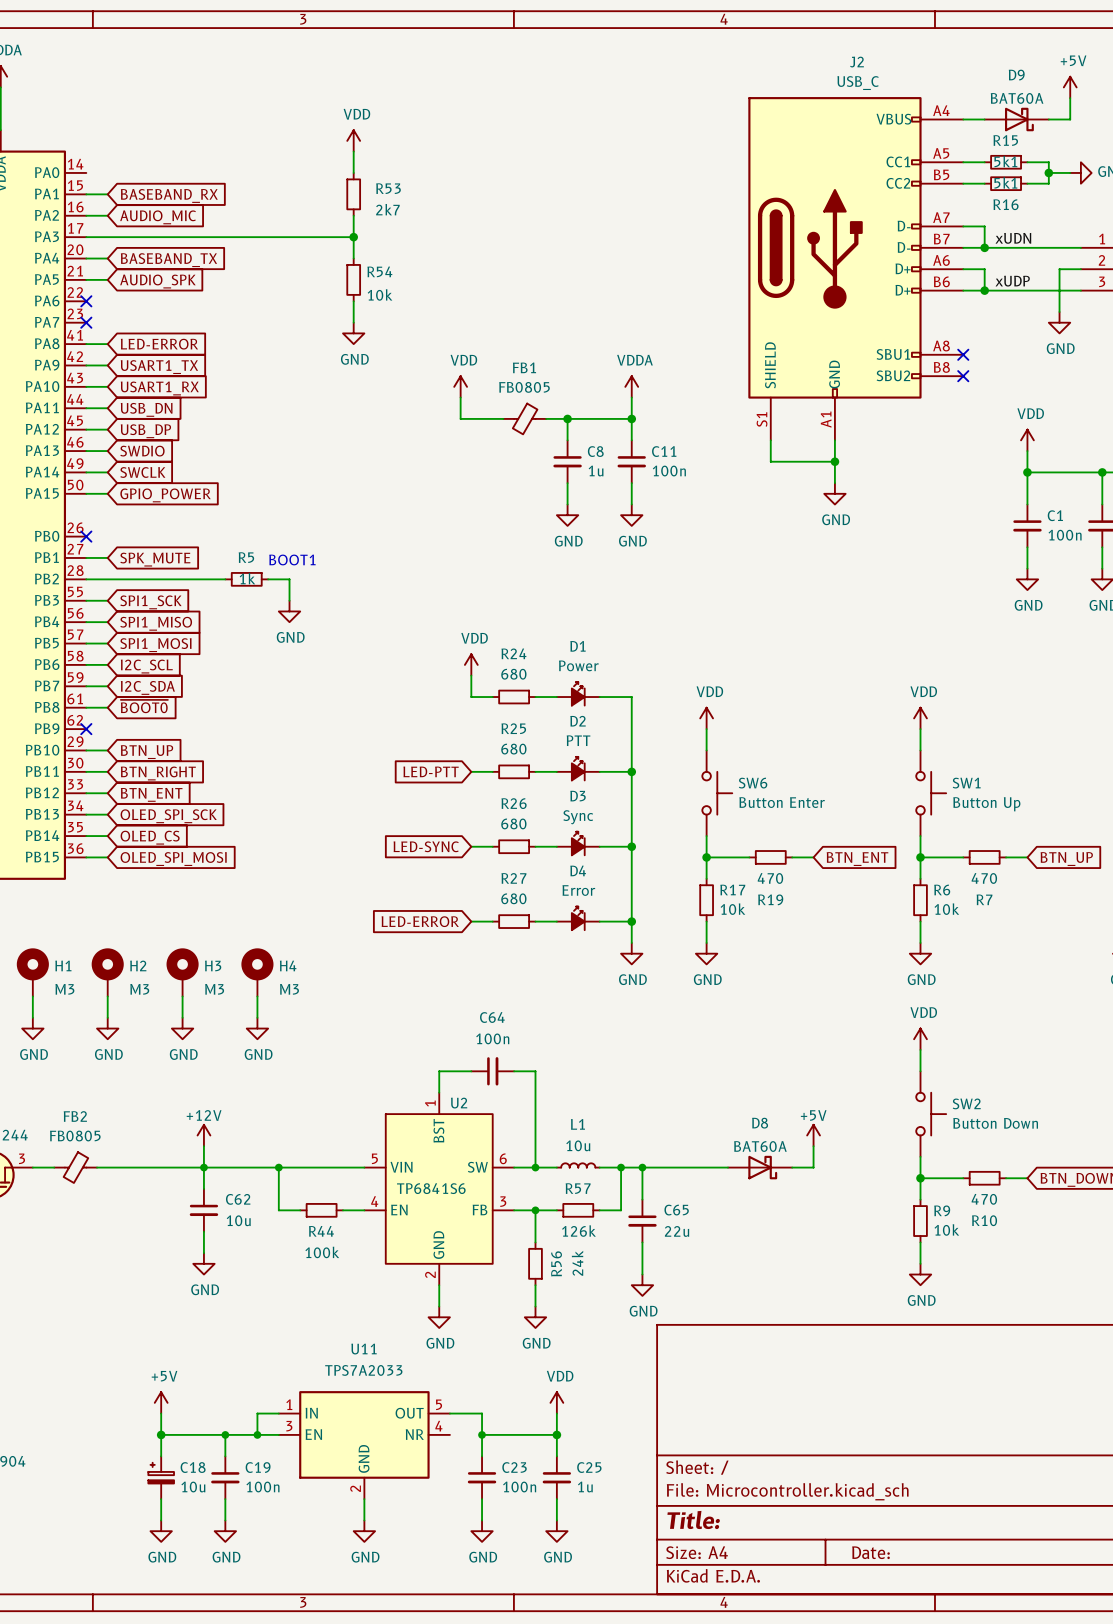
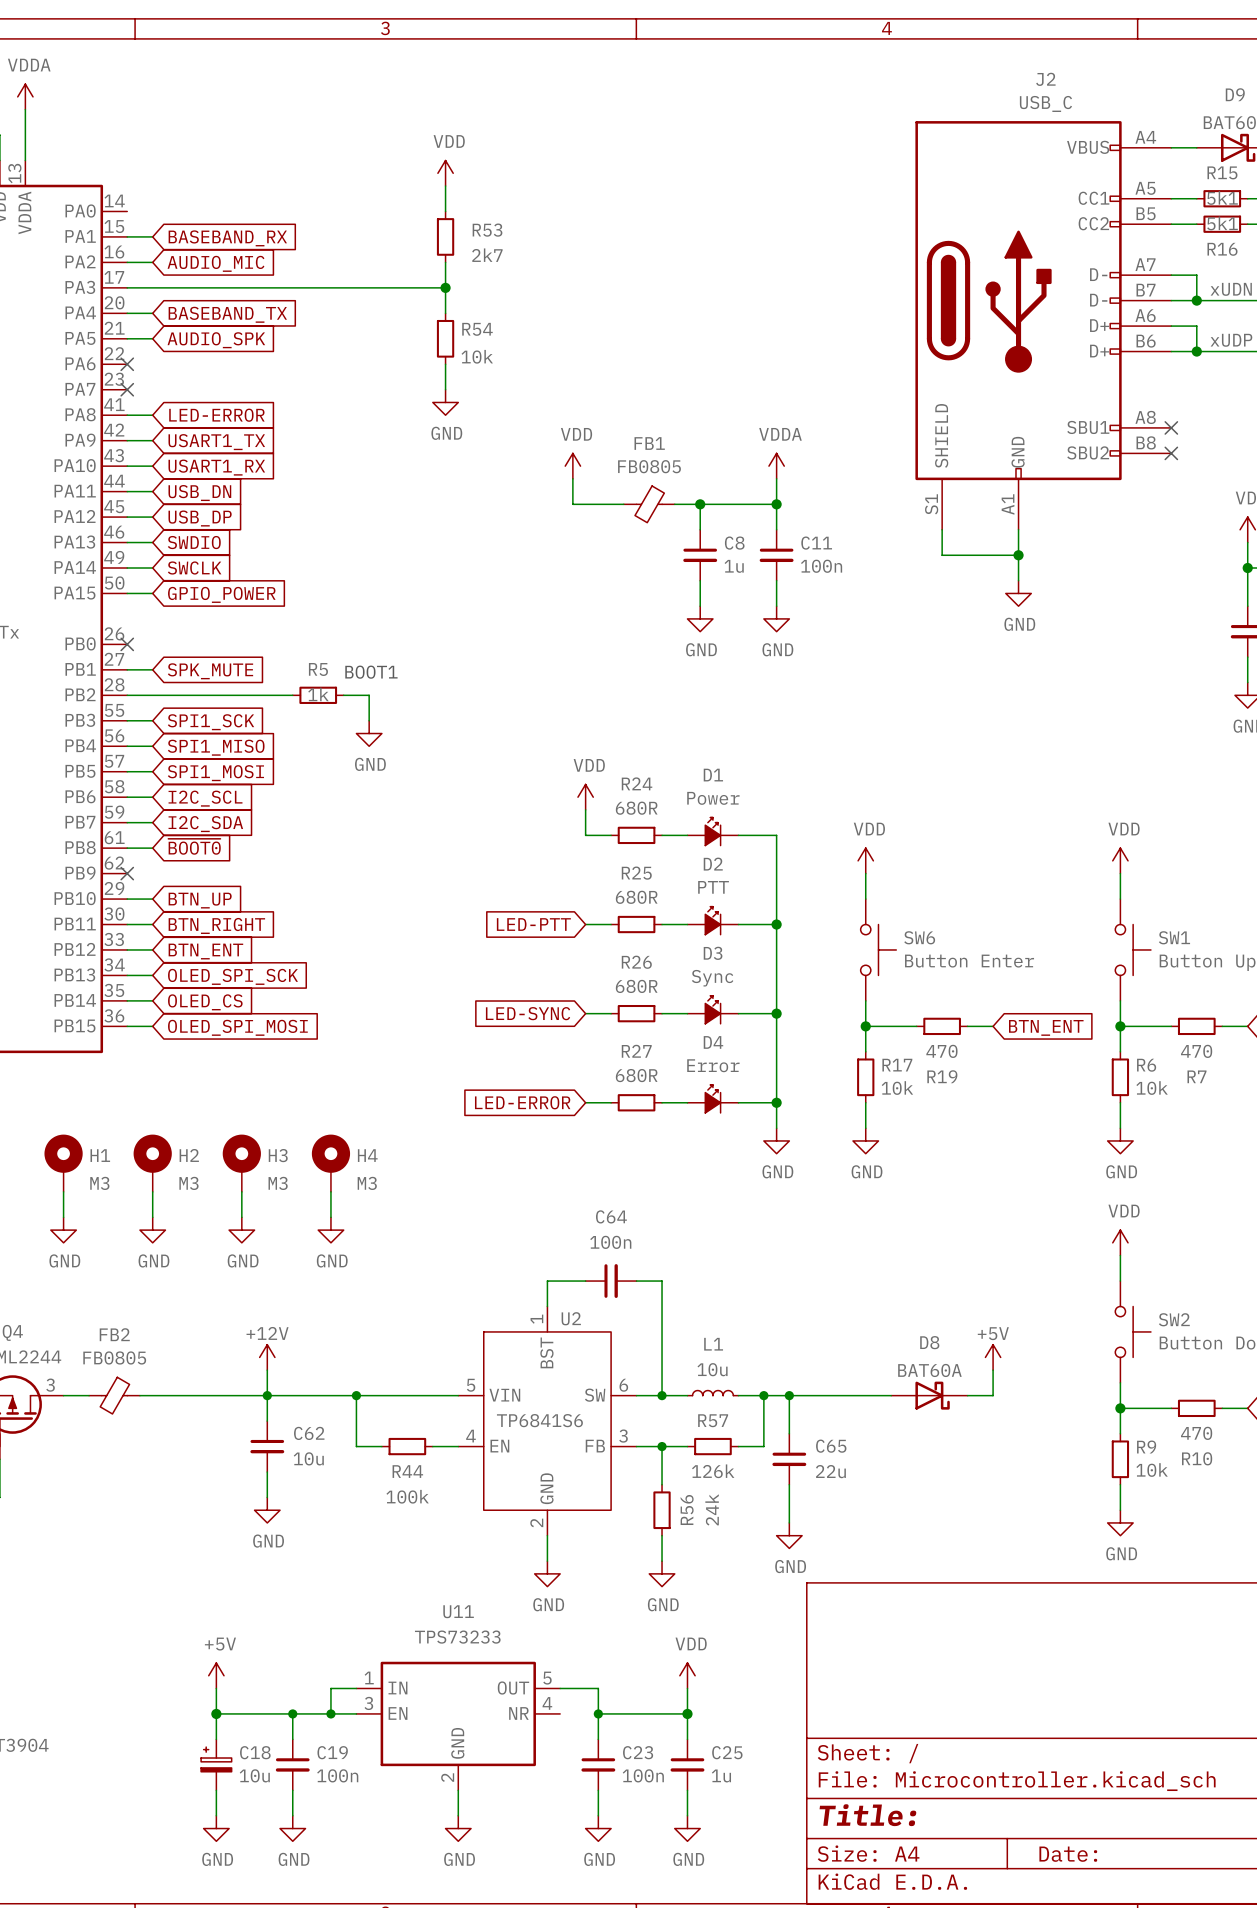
R24 value: 680 (513, 674) -> 680R (636, 808)
R25 value: 680 (513, 749) -> 680R (636, 897)
R26 value: 680 (513, 823) -> 680R (636, 986)
R27 value: 680 (513, 898) -> 680R (636, 1075)
U11 value: TPS7A2033 (363, 1370) -> TPS73233 (457, 1637)

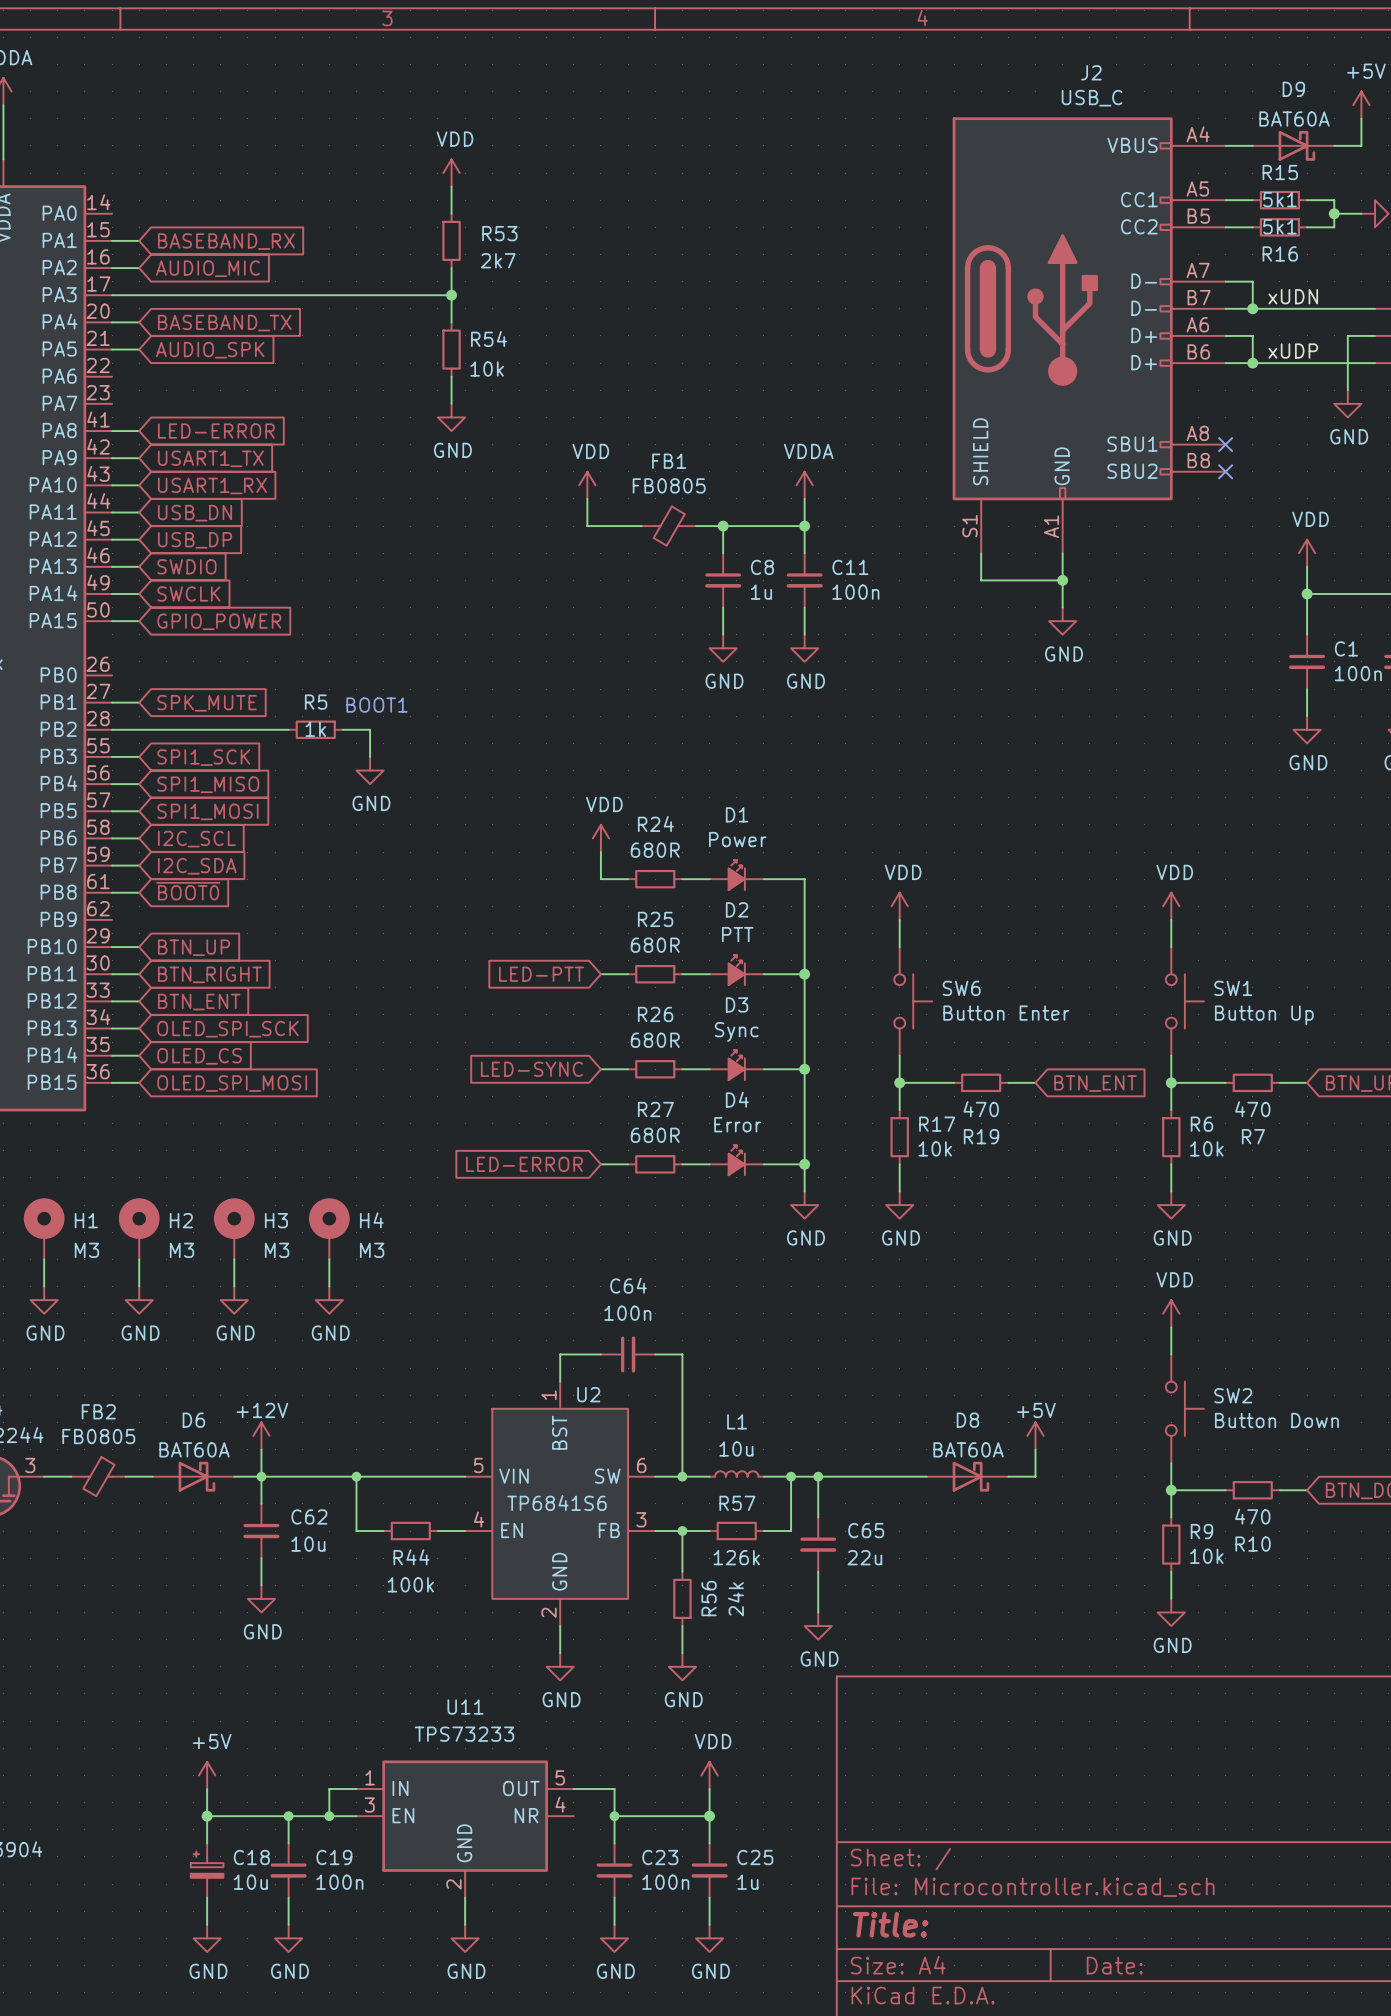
no-connect mark: (127, 364) -> none
no-connect mark: (127, 389) -> none
no-connect mark: (127, 644) -> none
no-connect mark: (127, 873) -> none
D6: none -> BAT60A (193, 1476)

